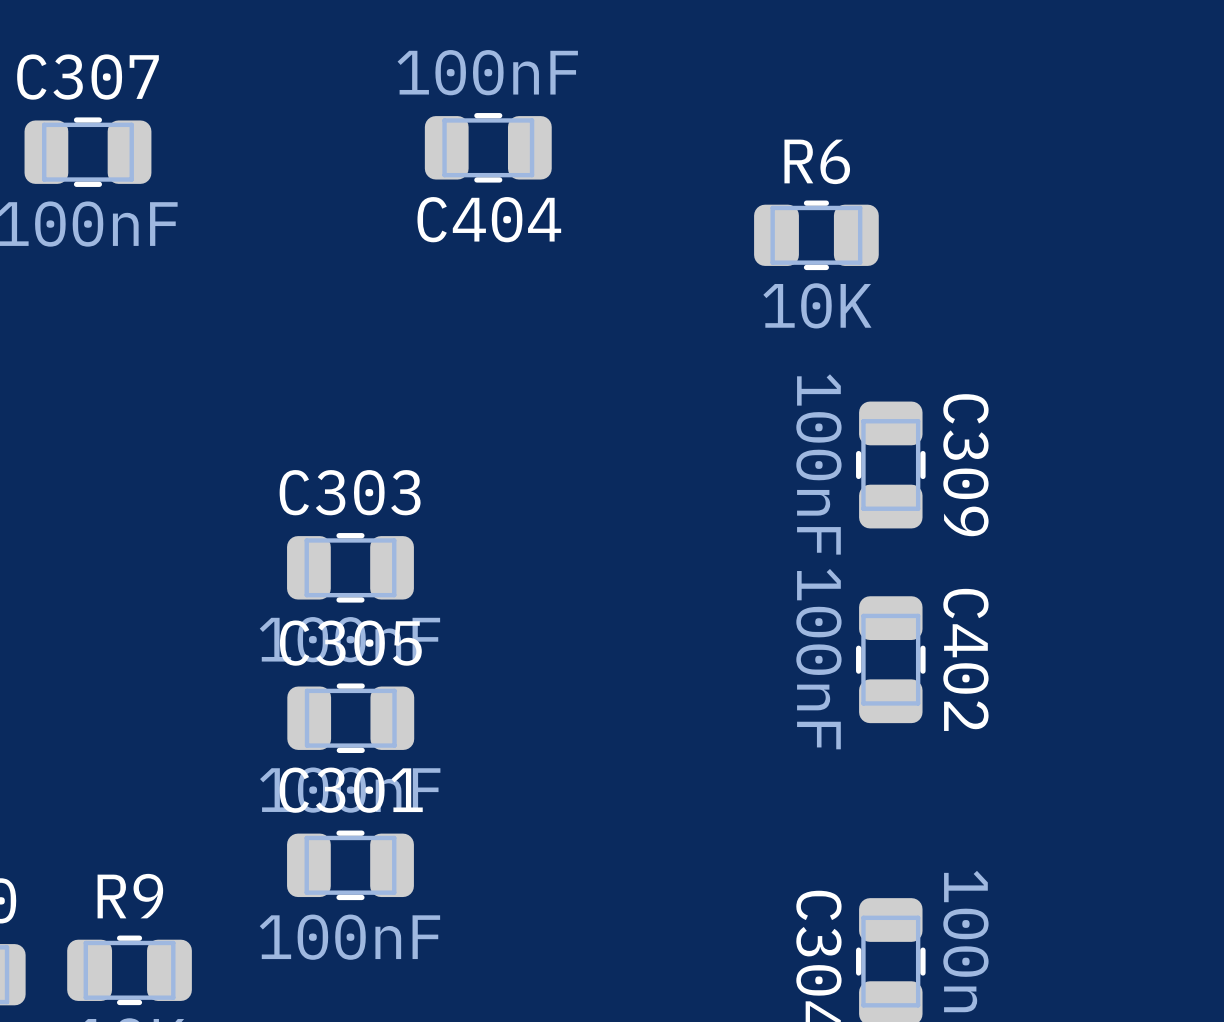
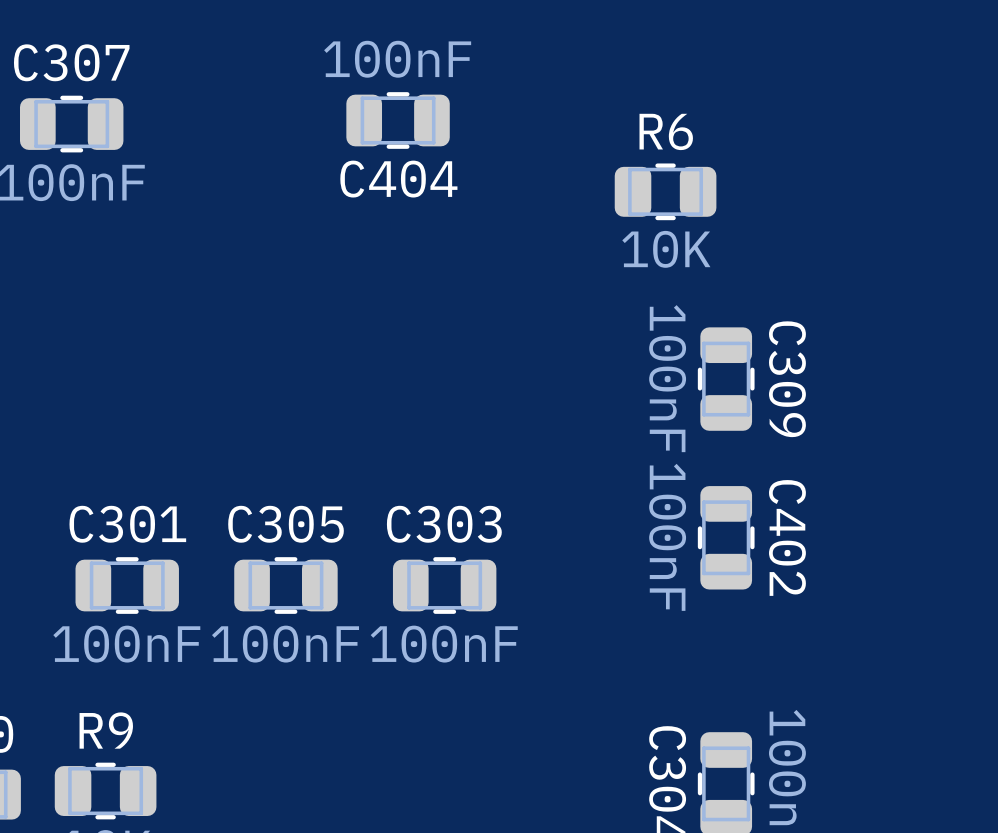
C303 position: (350, 567) -> (444, 585)
C301 position: (350, 865) -> (127, 585)

